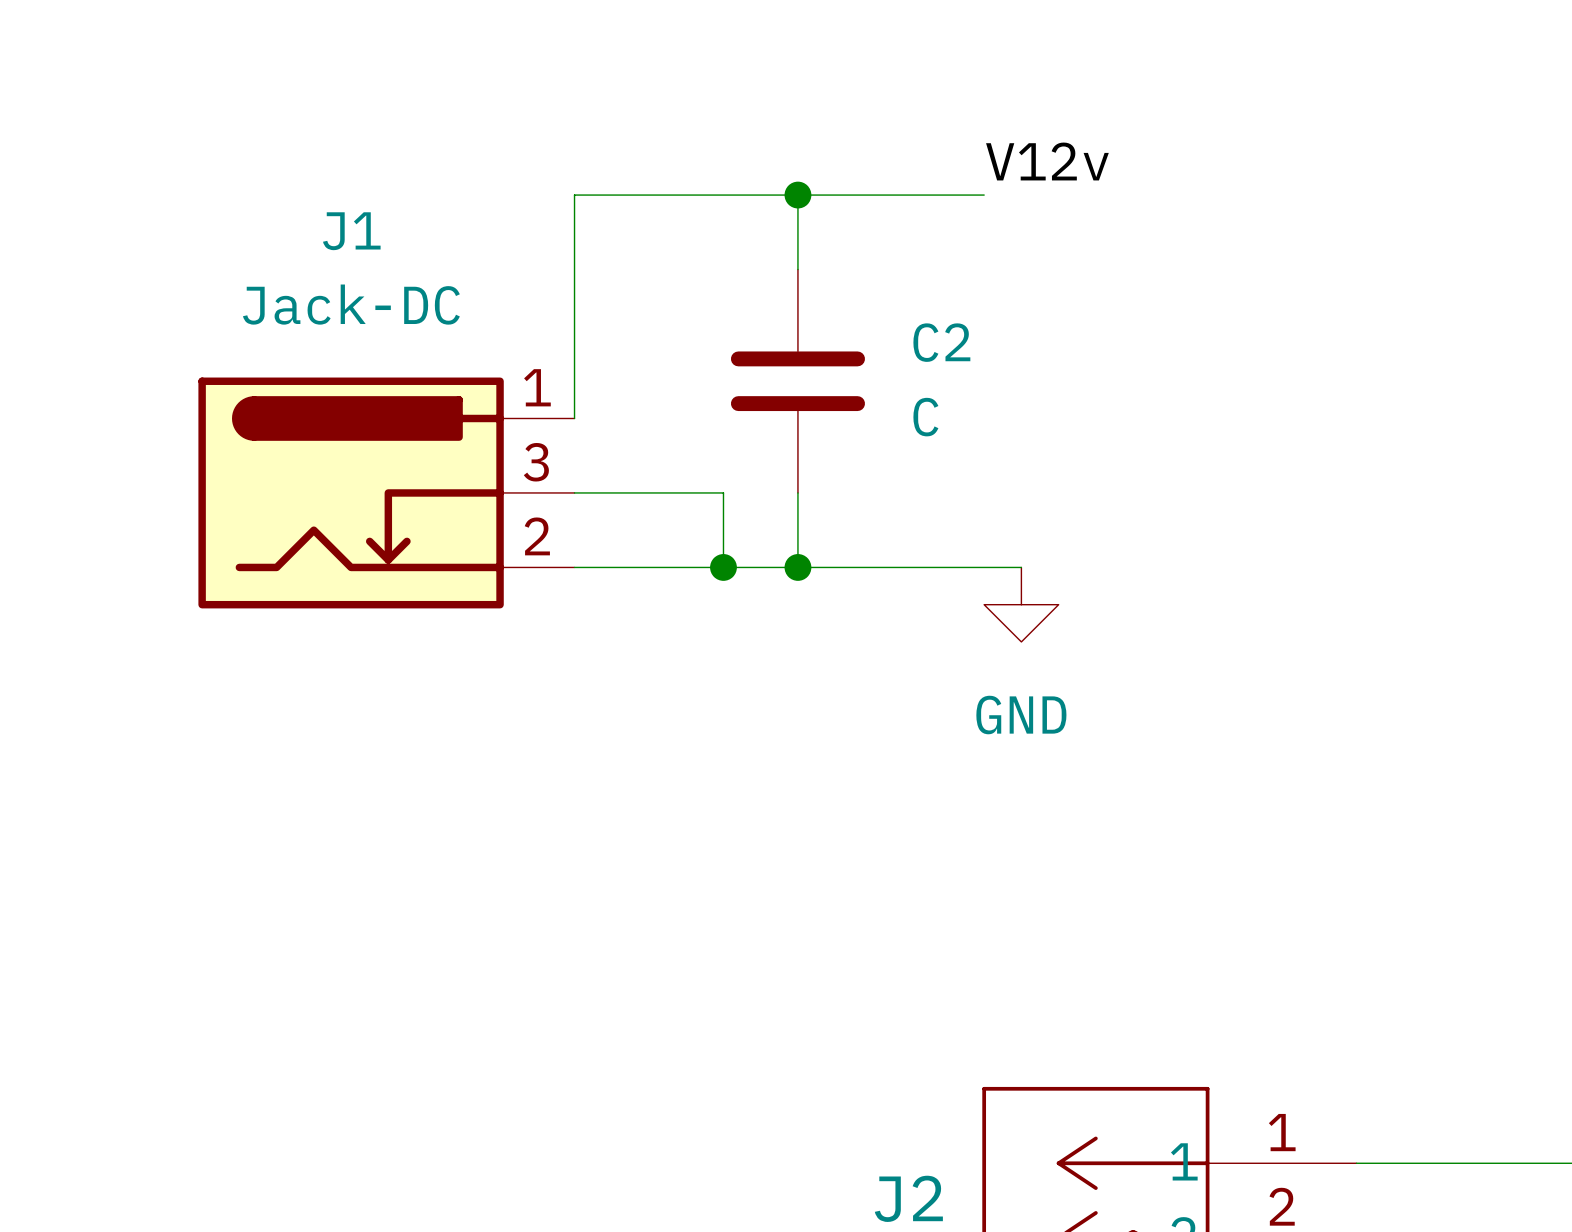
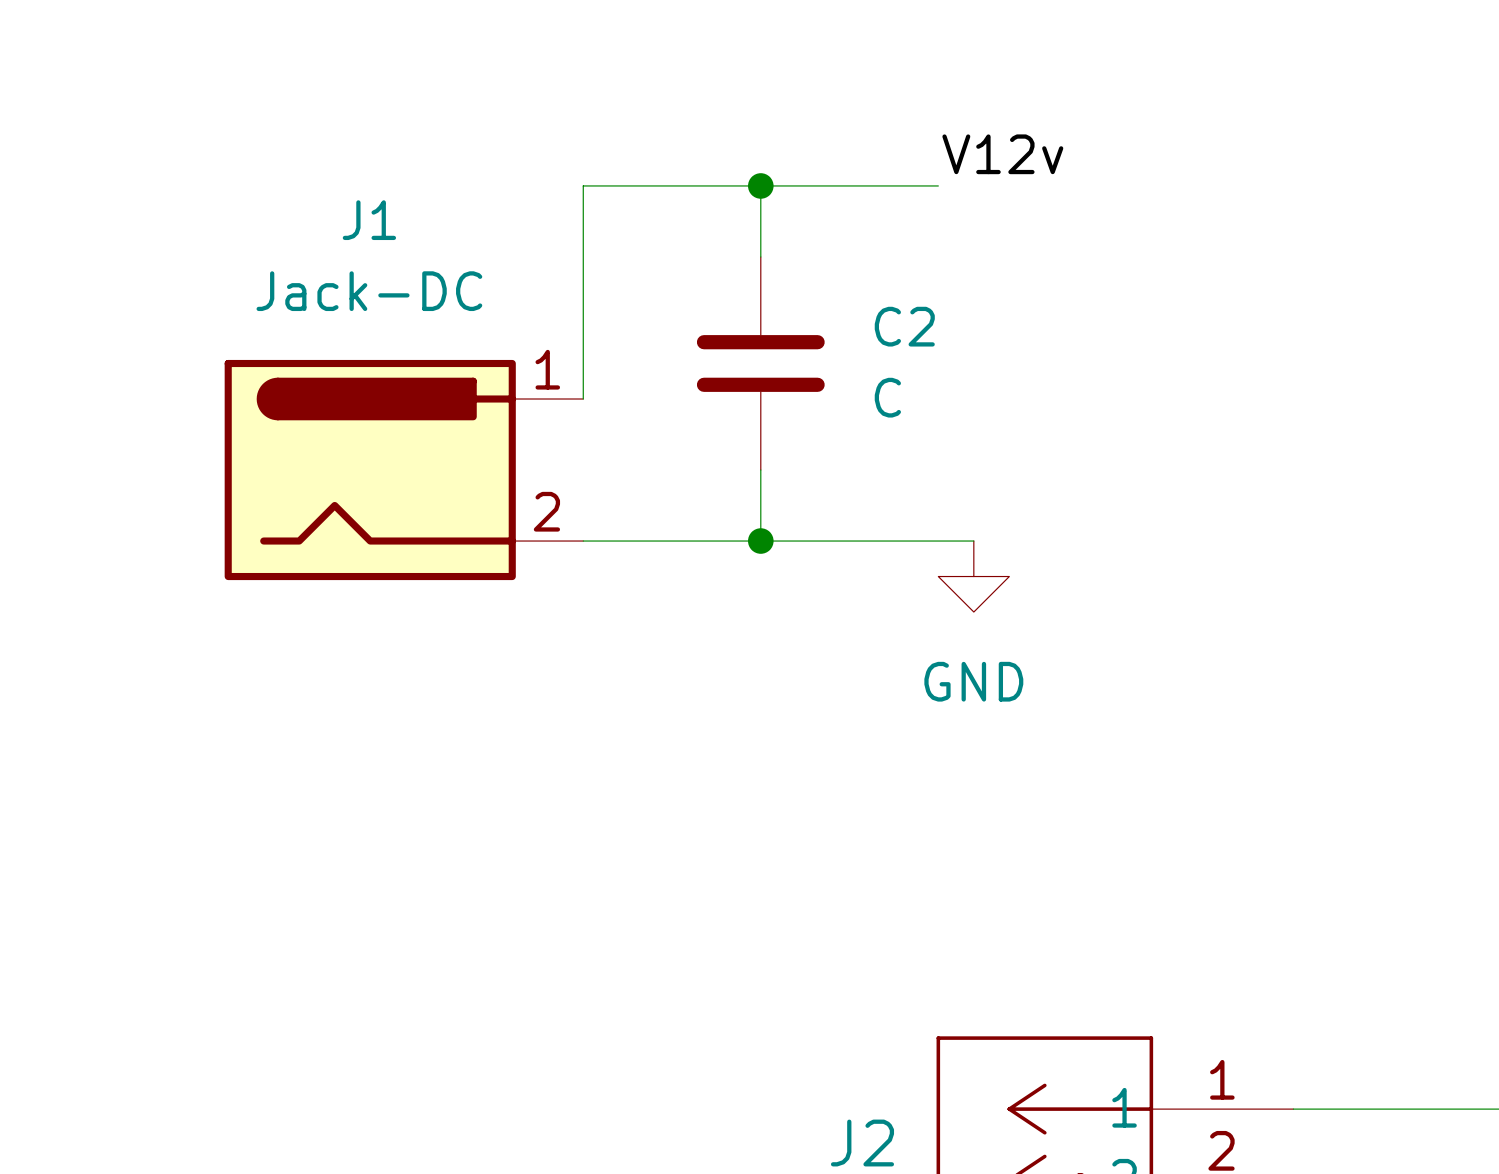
wire: (611, 195) (574, 195) (574, 418) -> (583, 185) (583, 399)
J1 symbol: [198, 377, 575, 609] -> [224, 359, 584, 581]
wire: (574, 492) (723, 492) (723, 567) -> none
junction: (723, 567) -> none

